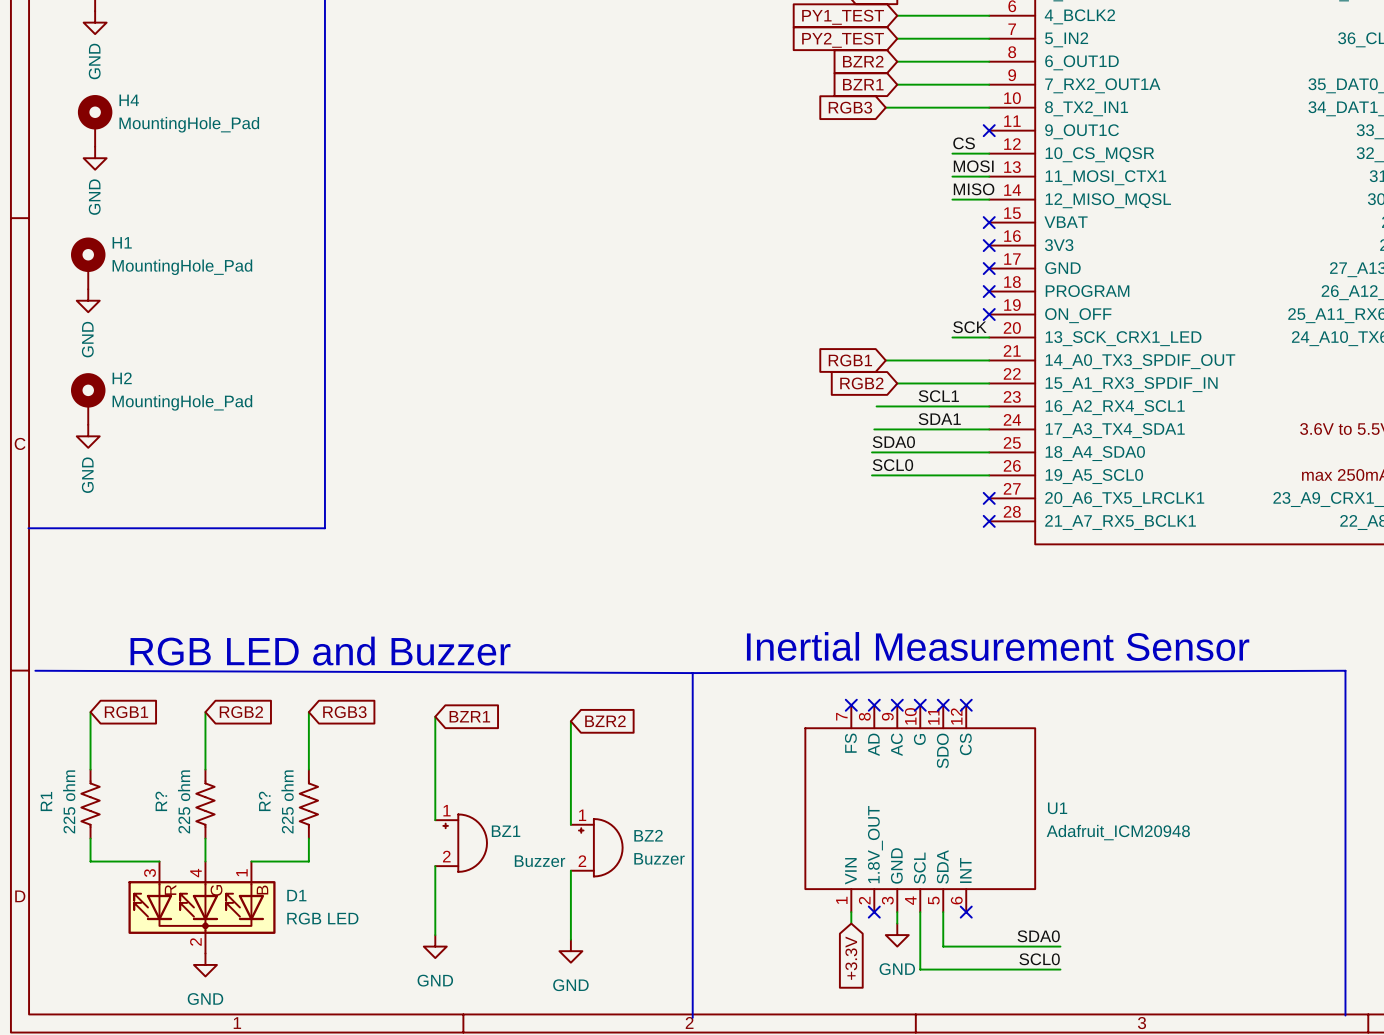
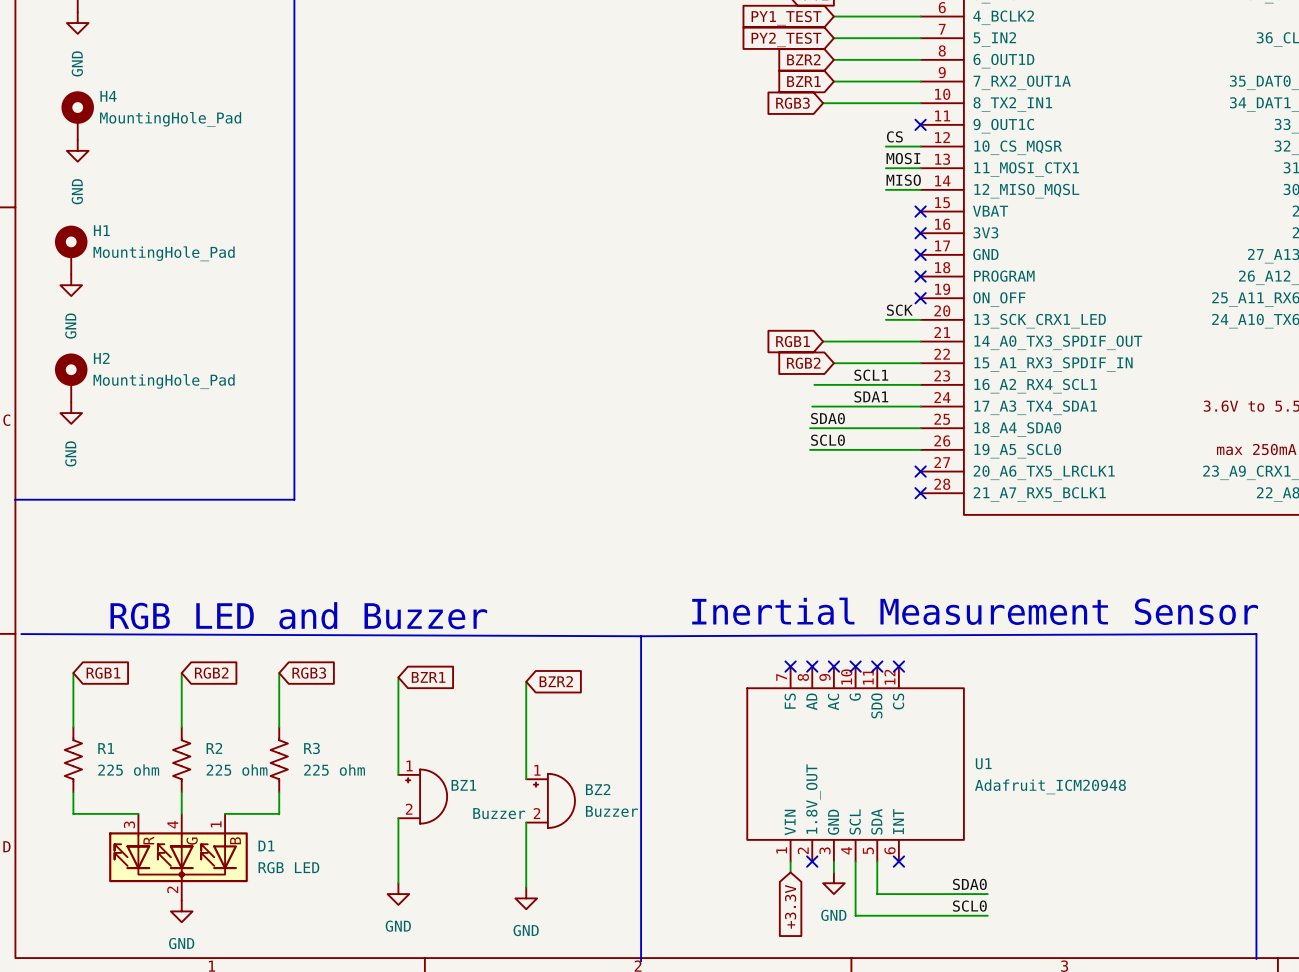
R1 name rotation: 0° (46, 801) -> 90° clockwise (106, 748)
R1 name position: R1 (46, 801) -> R1 (106, 748)
R1 value rotation: 0° (69, 801) -> 90° clockwise (128, 770)
R1 value position: 225 ohm (69, 801) -> 225 ohm (128, 770)
R? name: R? (161, 801) -> R2 (214, 748)
R? value rotation: 0° (184, 801) -> 90° clockwise (237, 770)
R? value position: 225 ohm (184, 801) -> 225 ohm (237, 770)
R? name: R? (264, 801) -> R3 (311, 748)
R? value rotation: 0° (287, 801) -> 90° clockwise (334, 770)
R? value position: 225 ohm (287, 801) -> 225 ohm (334, 770)

